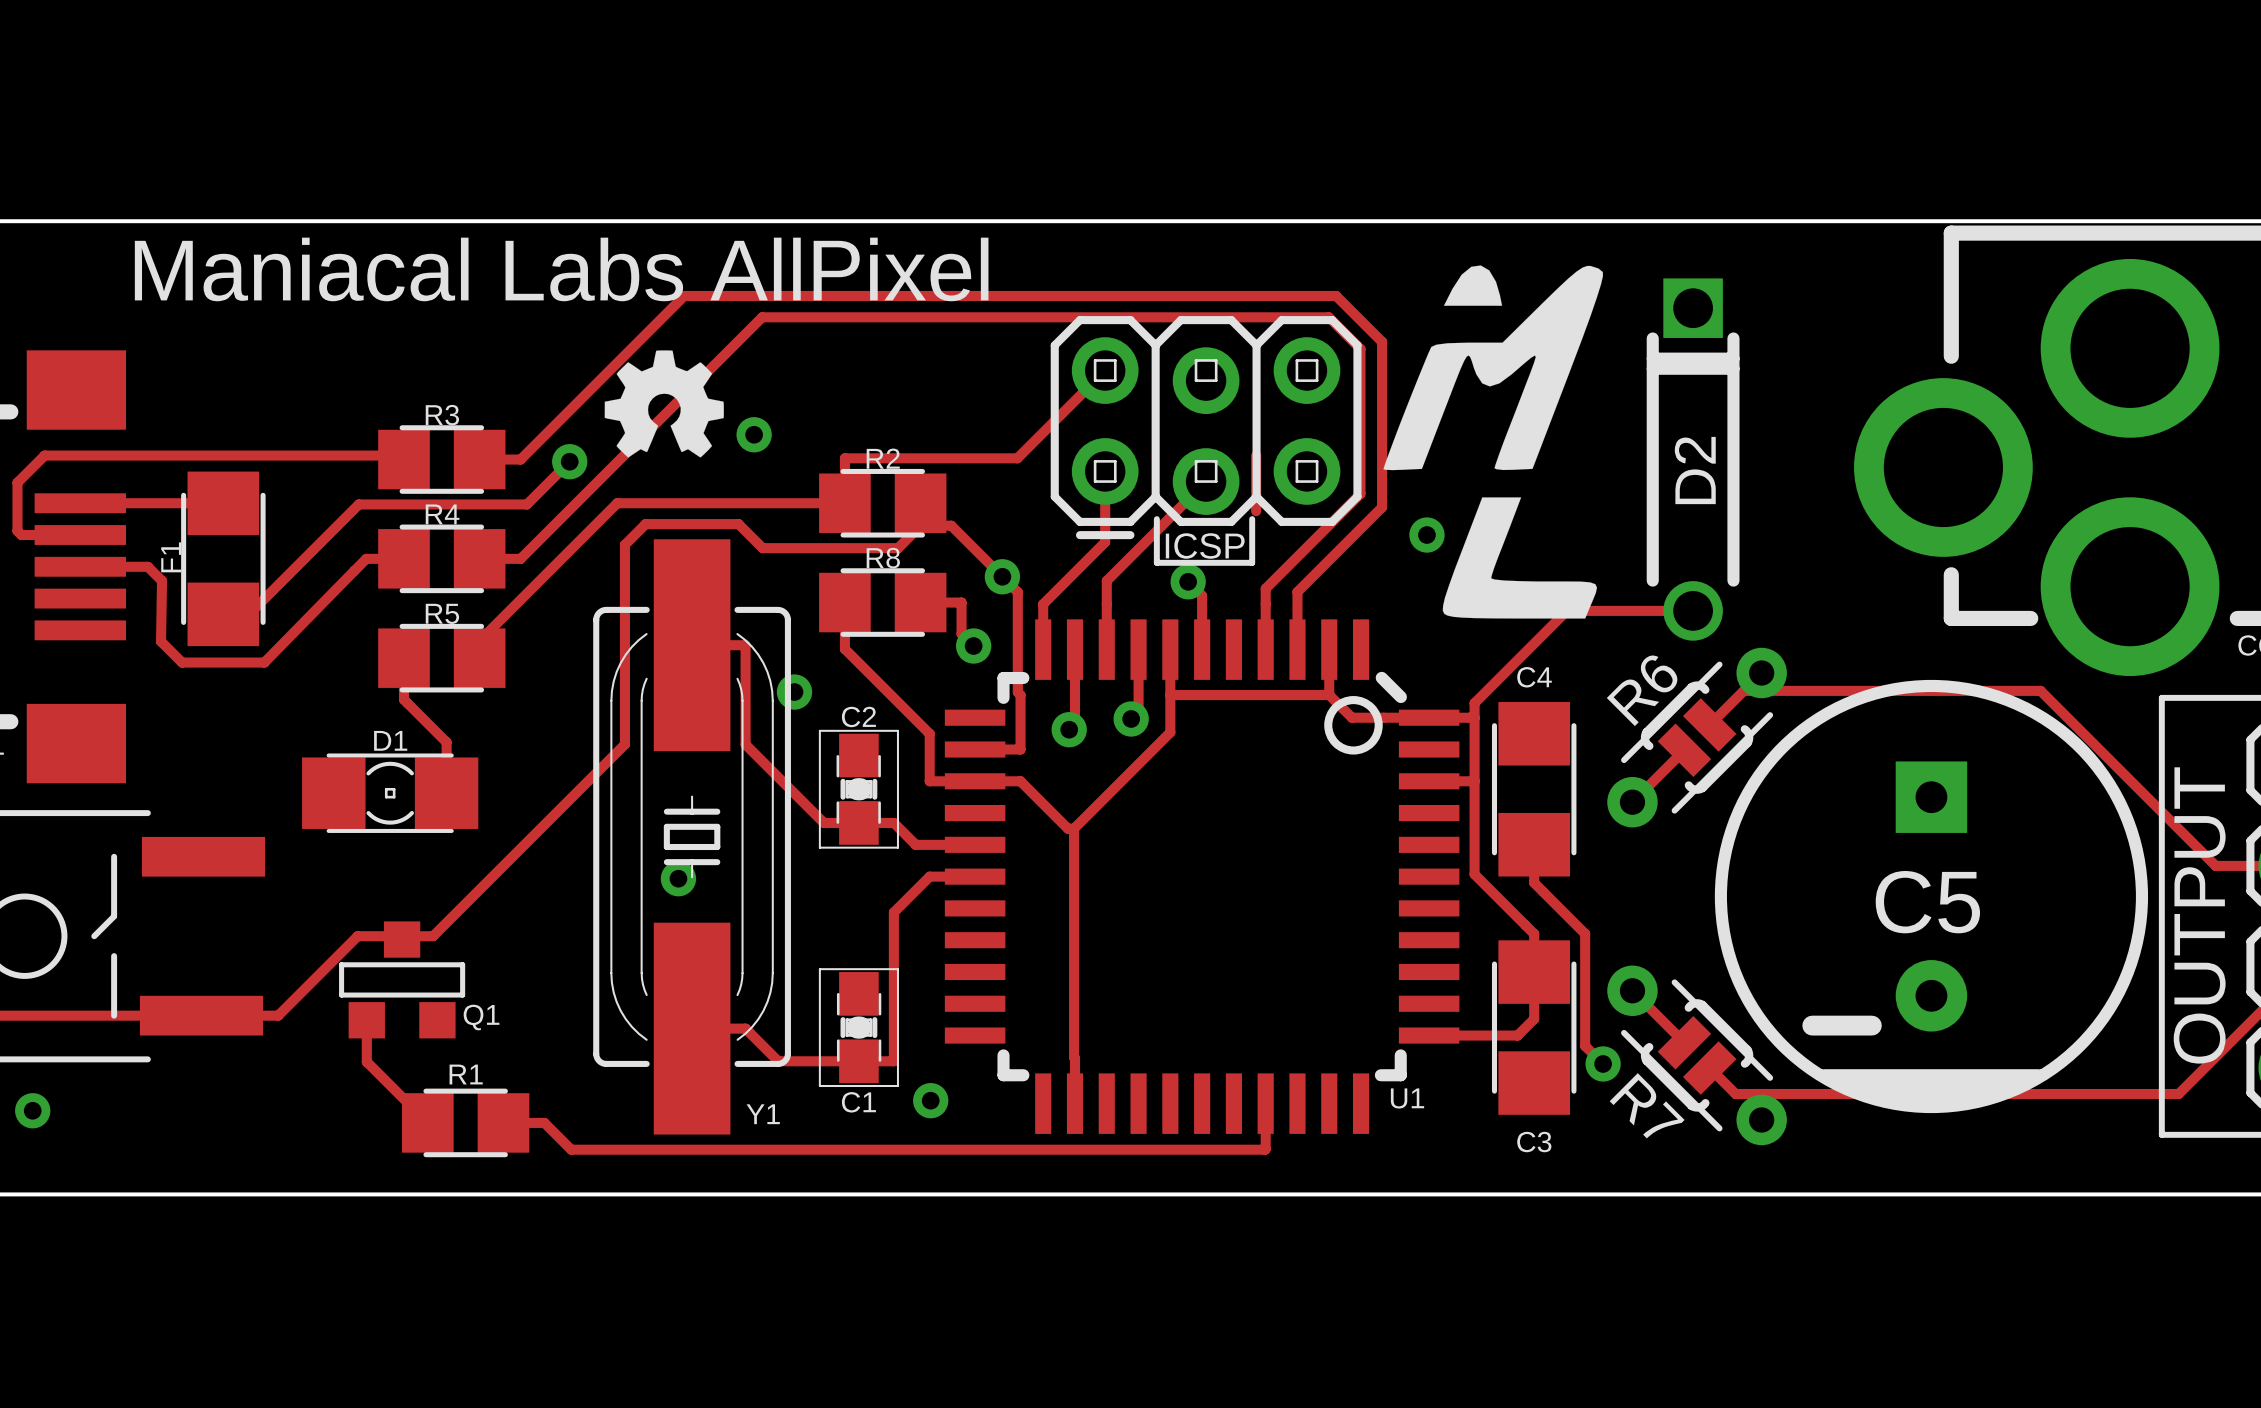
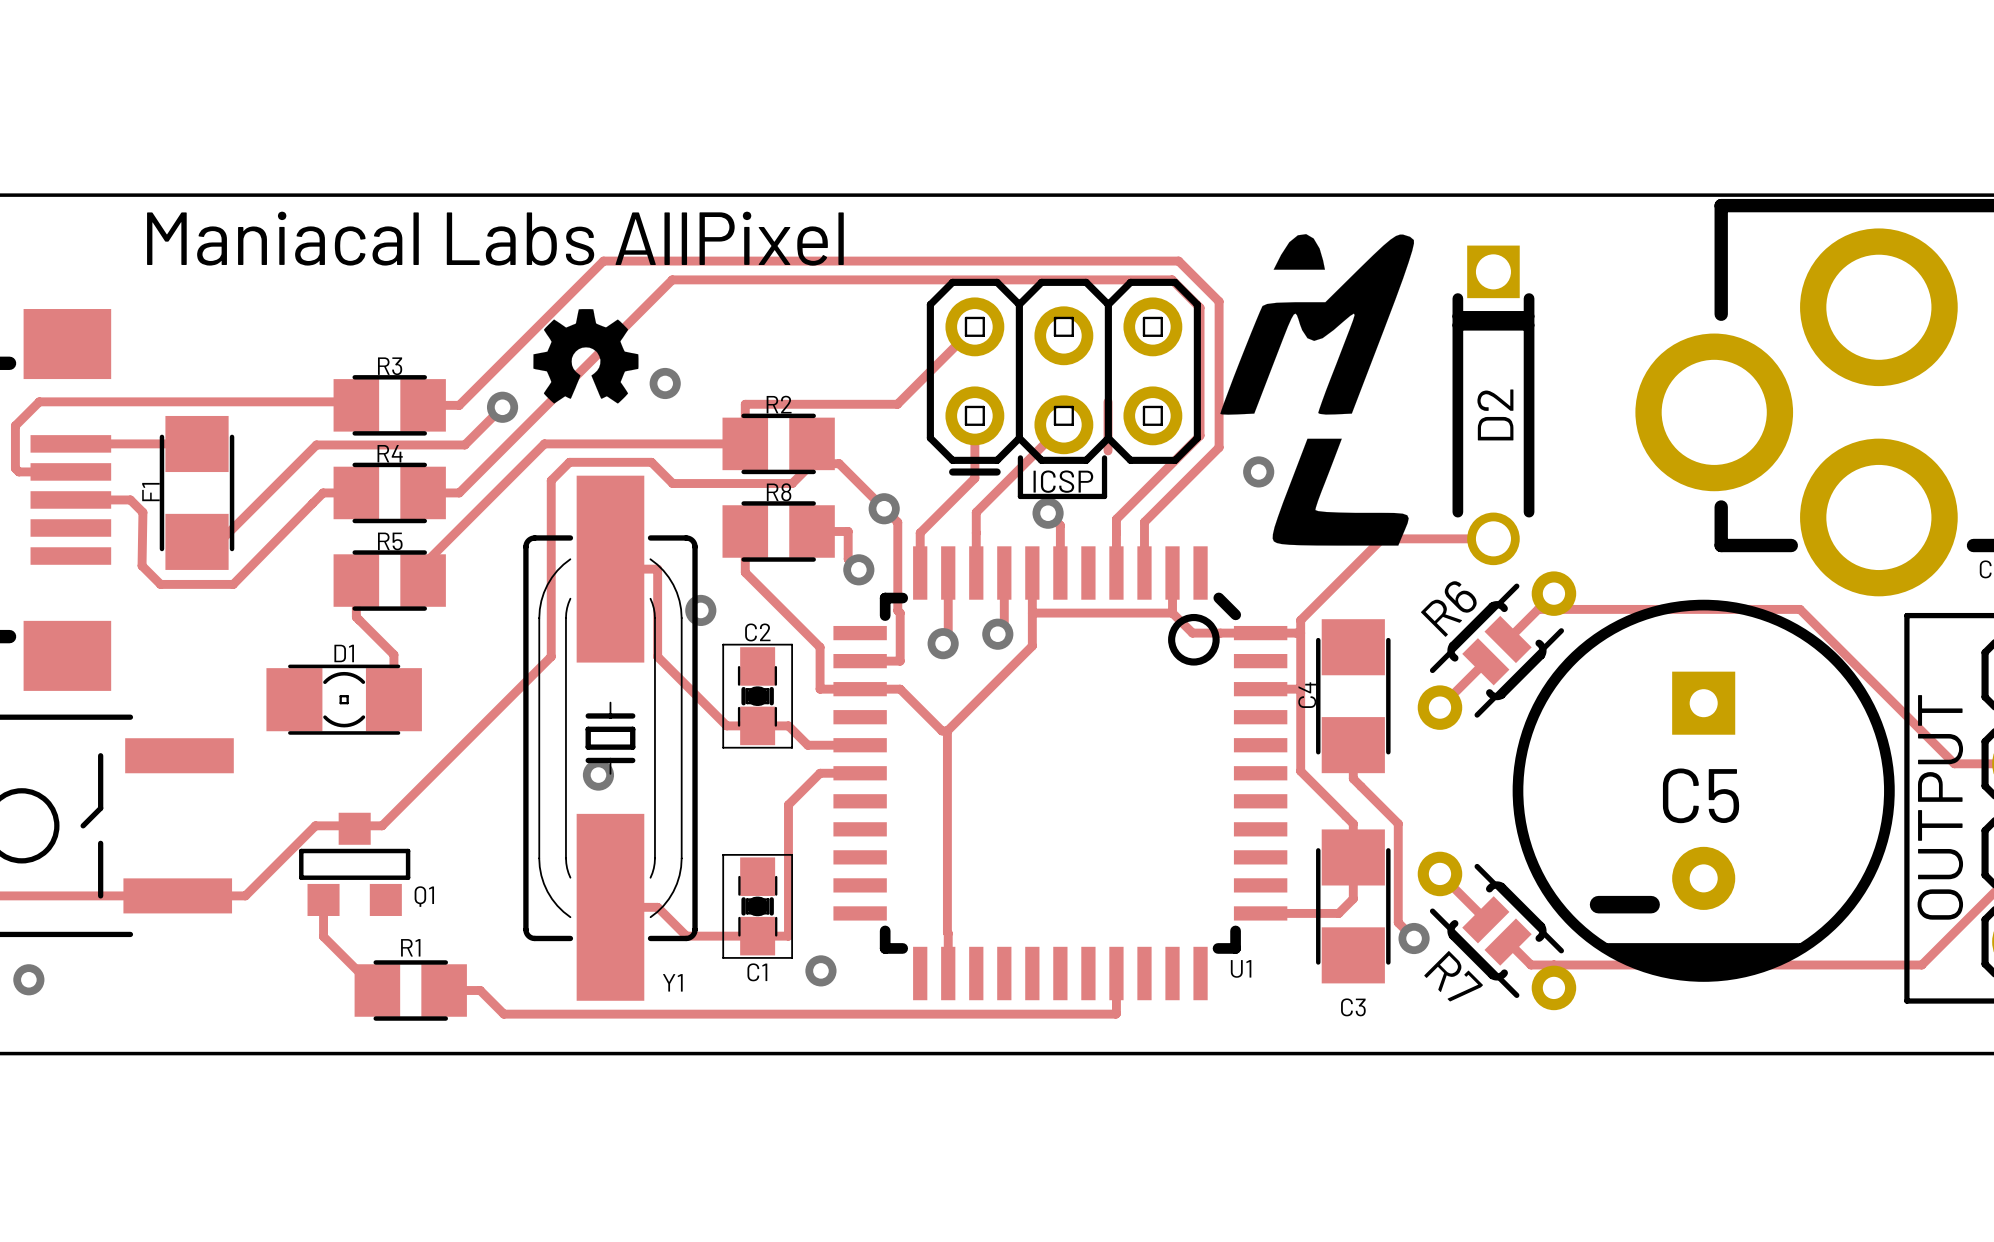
C4 name rotation: 0° (1534, 677) -> 90° counterclockwise (1307, 695)
C4 name position: C4 (1534, 677) -> C4 (1307, 695)

